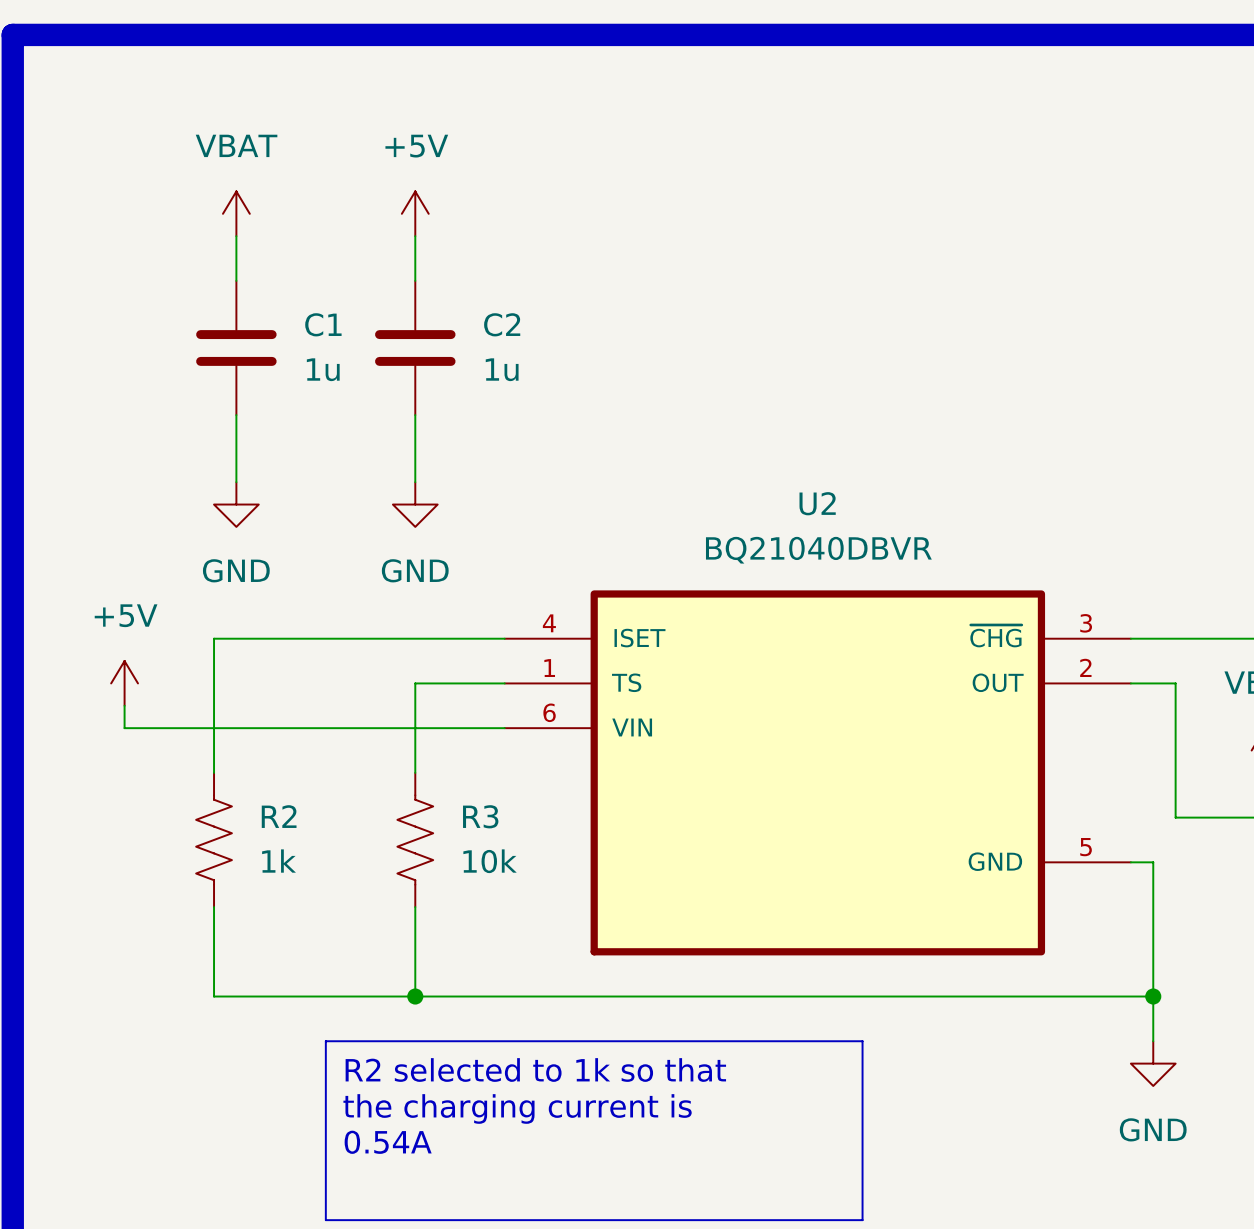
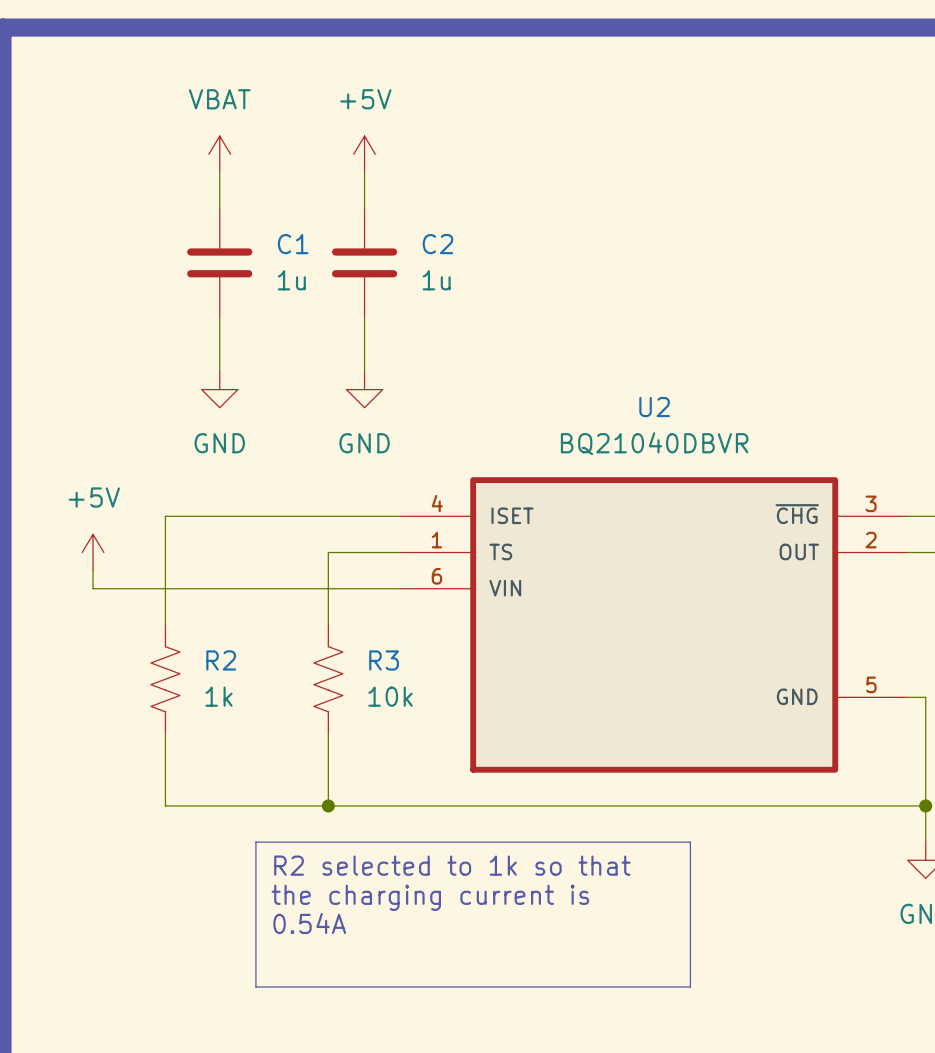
power symbol position: VBAT (236, 213) -> VBAT (219, 154)
power symbol position: +5V (415, 213) -> +5V (364, 154)
wire: (236, 236) (236, 280) -> (219, 172) (219, 208)
wire: (415, 236) (415, 280) -> (364, 172) (364, 208)
C1 position: (236, 347) -> (219, 262)
C2 position: (415, 347) -> (364, 262)
wire: (236, 415) (236, 482) -> (219, 317) (219, 371)
wire: (415, 415) (415, 482) -> (364, 317) (364, 371)
power symbol position: GND (236, 504) -> GND (219, 389)
power symbol position: GND (415, 504) -> GND (364, 389)

